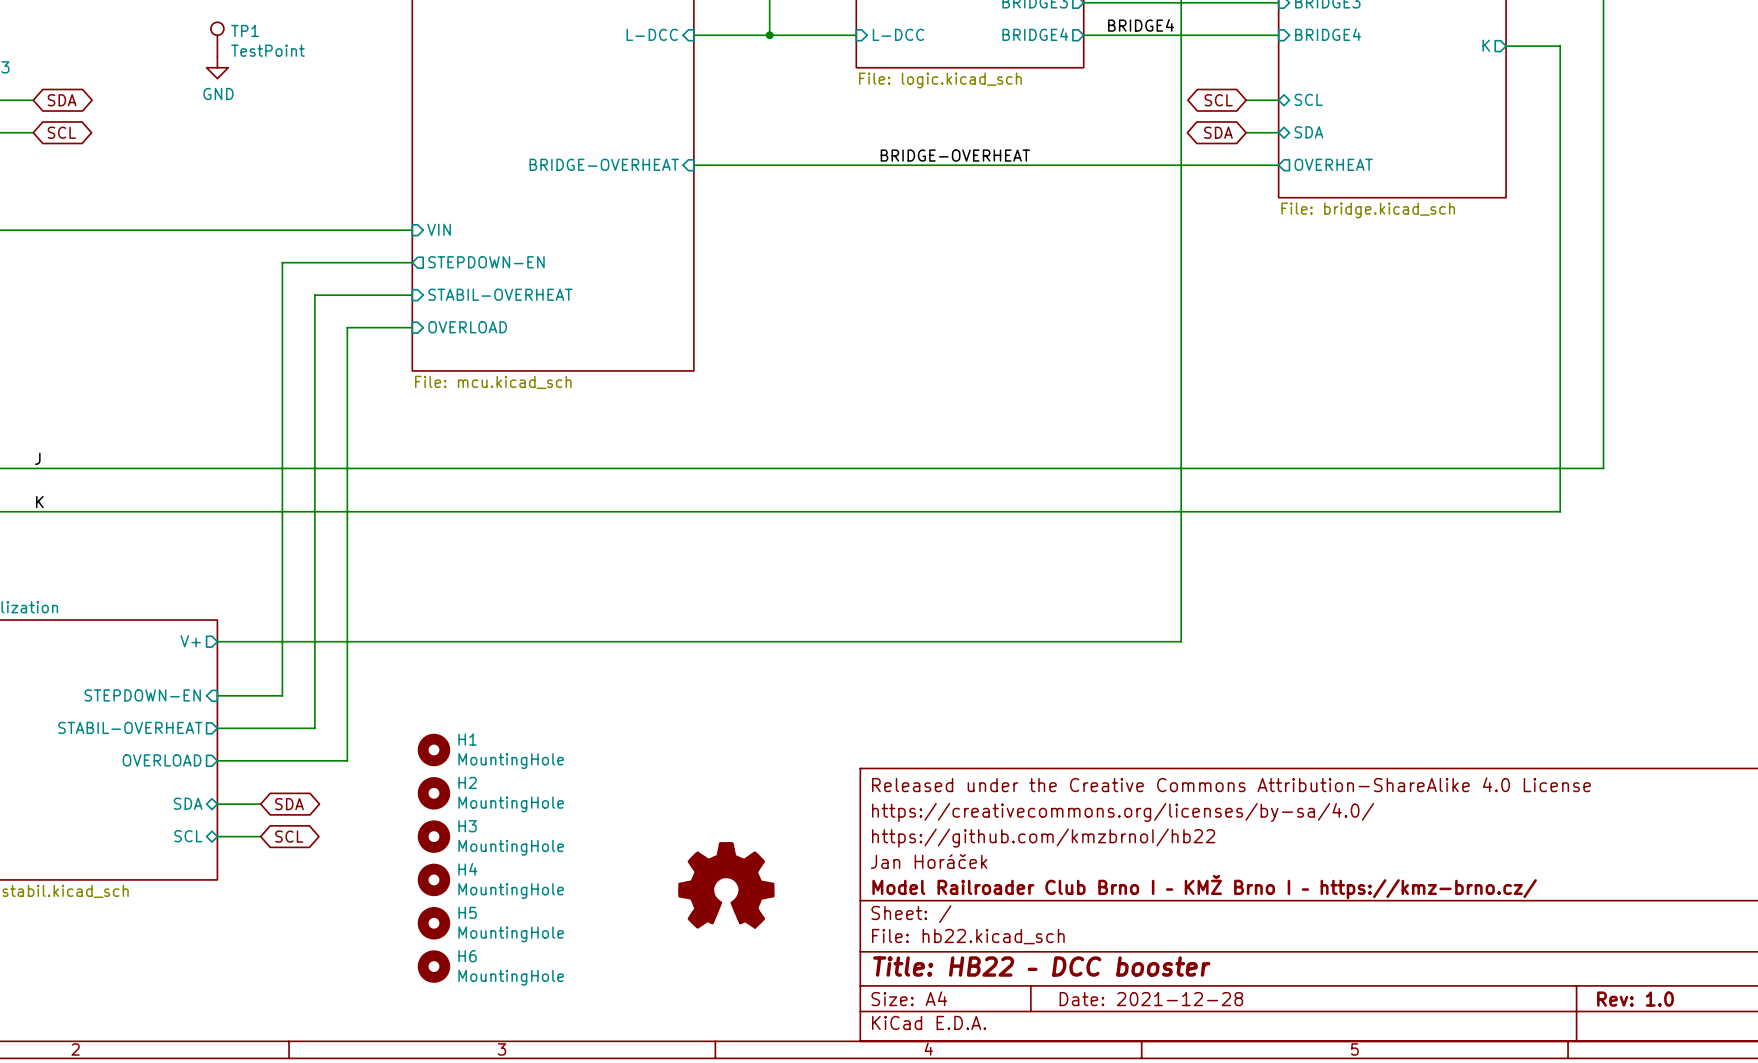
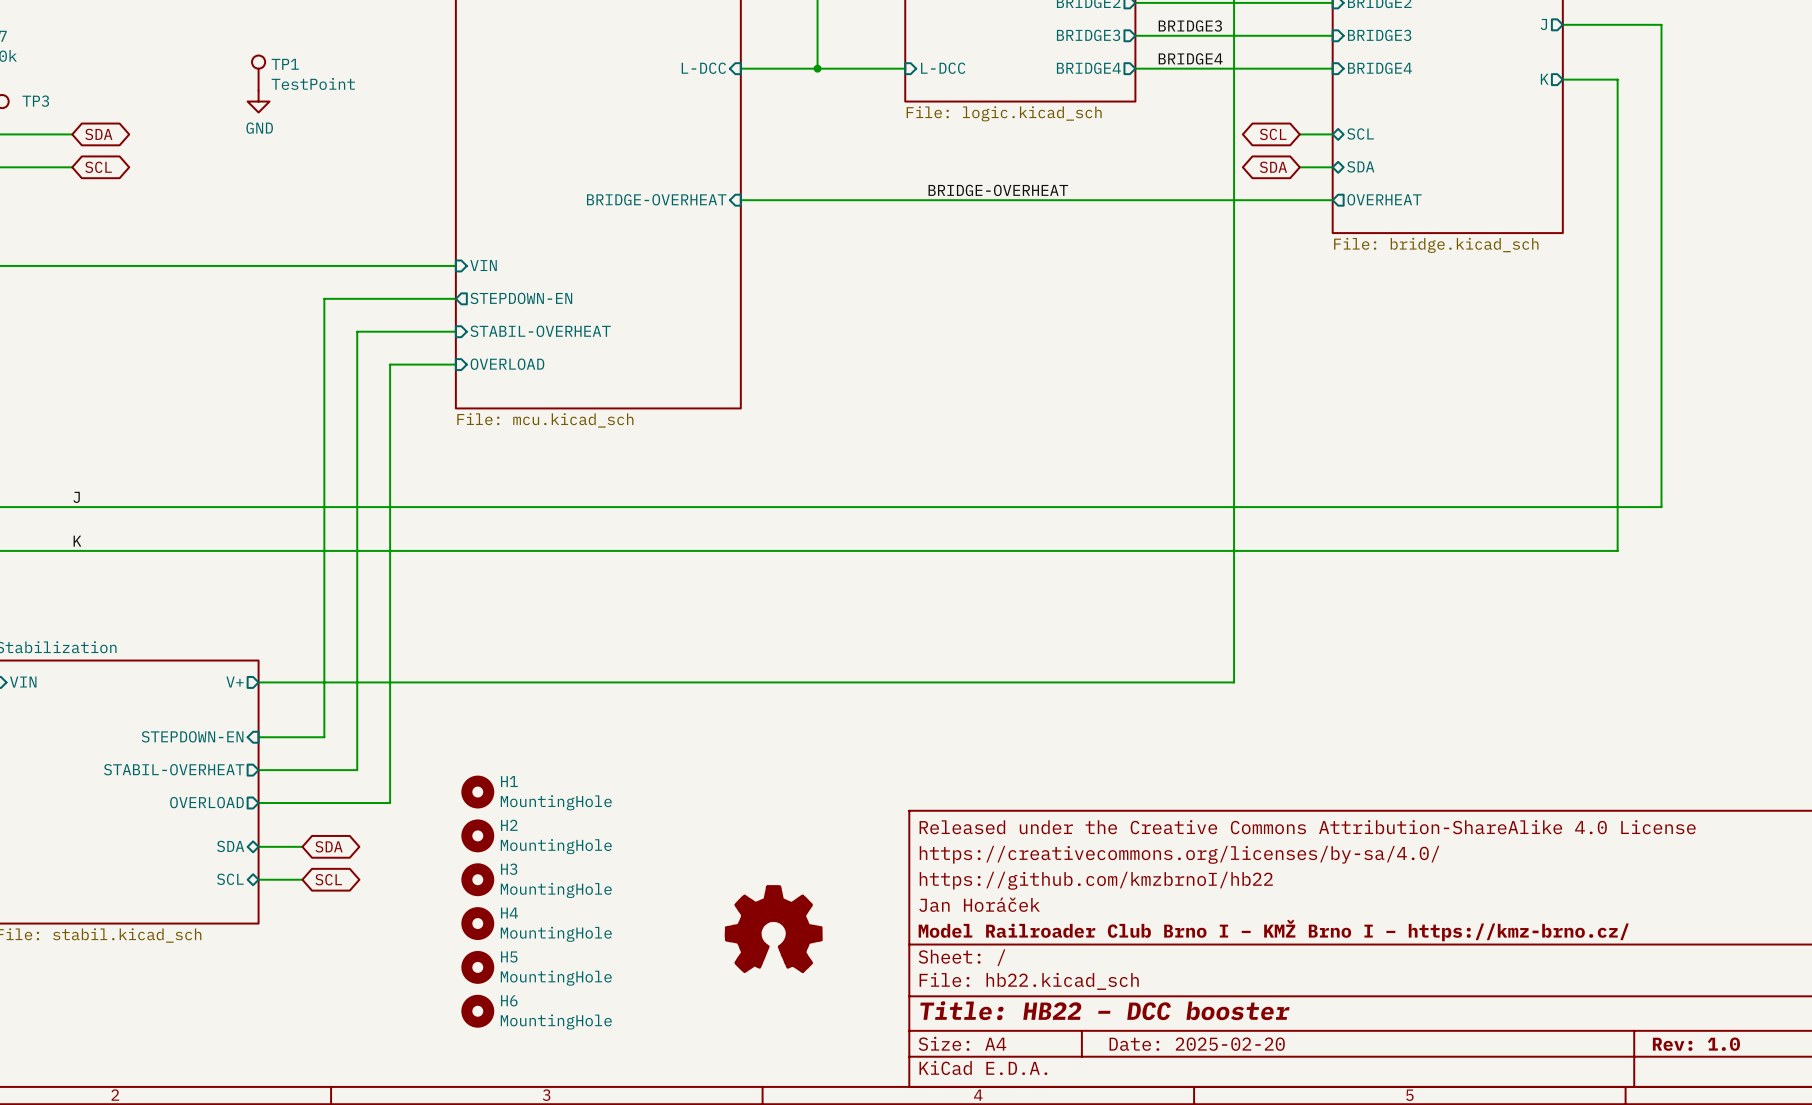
title block: Date: 2021-12-28 (1151, 999) -> Date: 2025-02-20 (1197, 1044)

